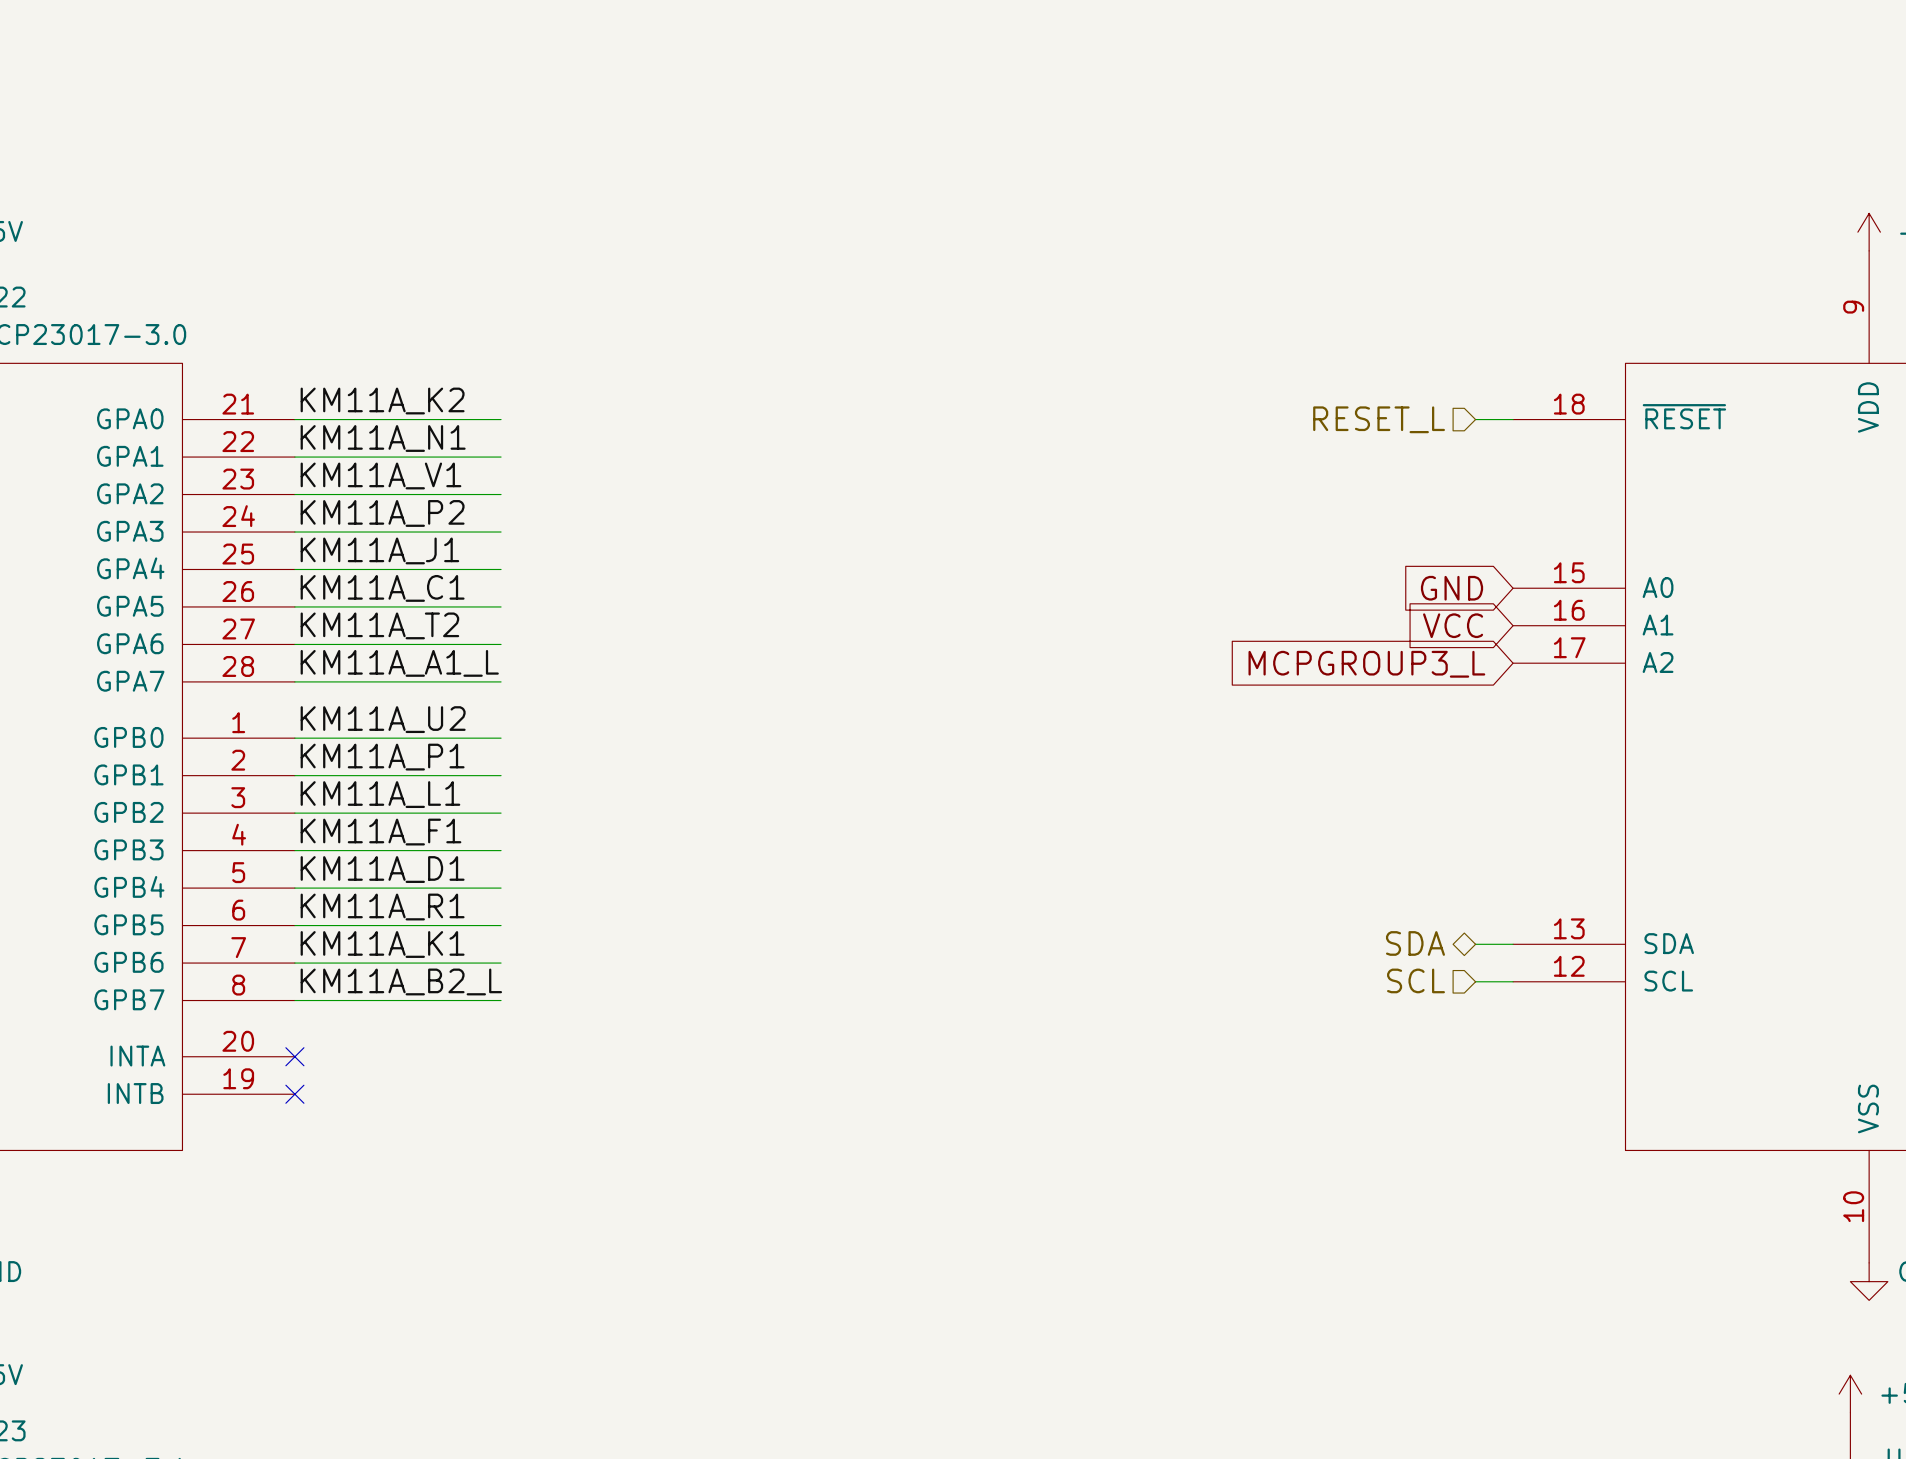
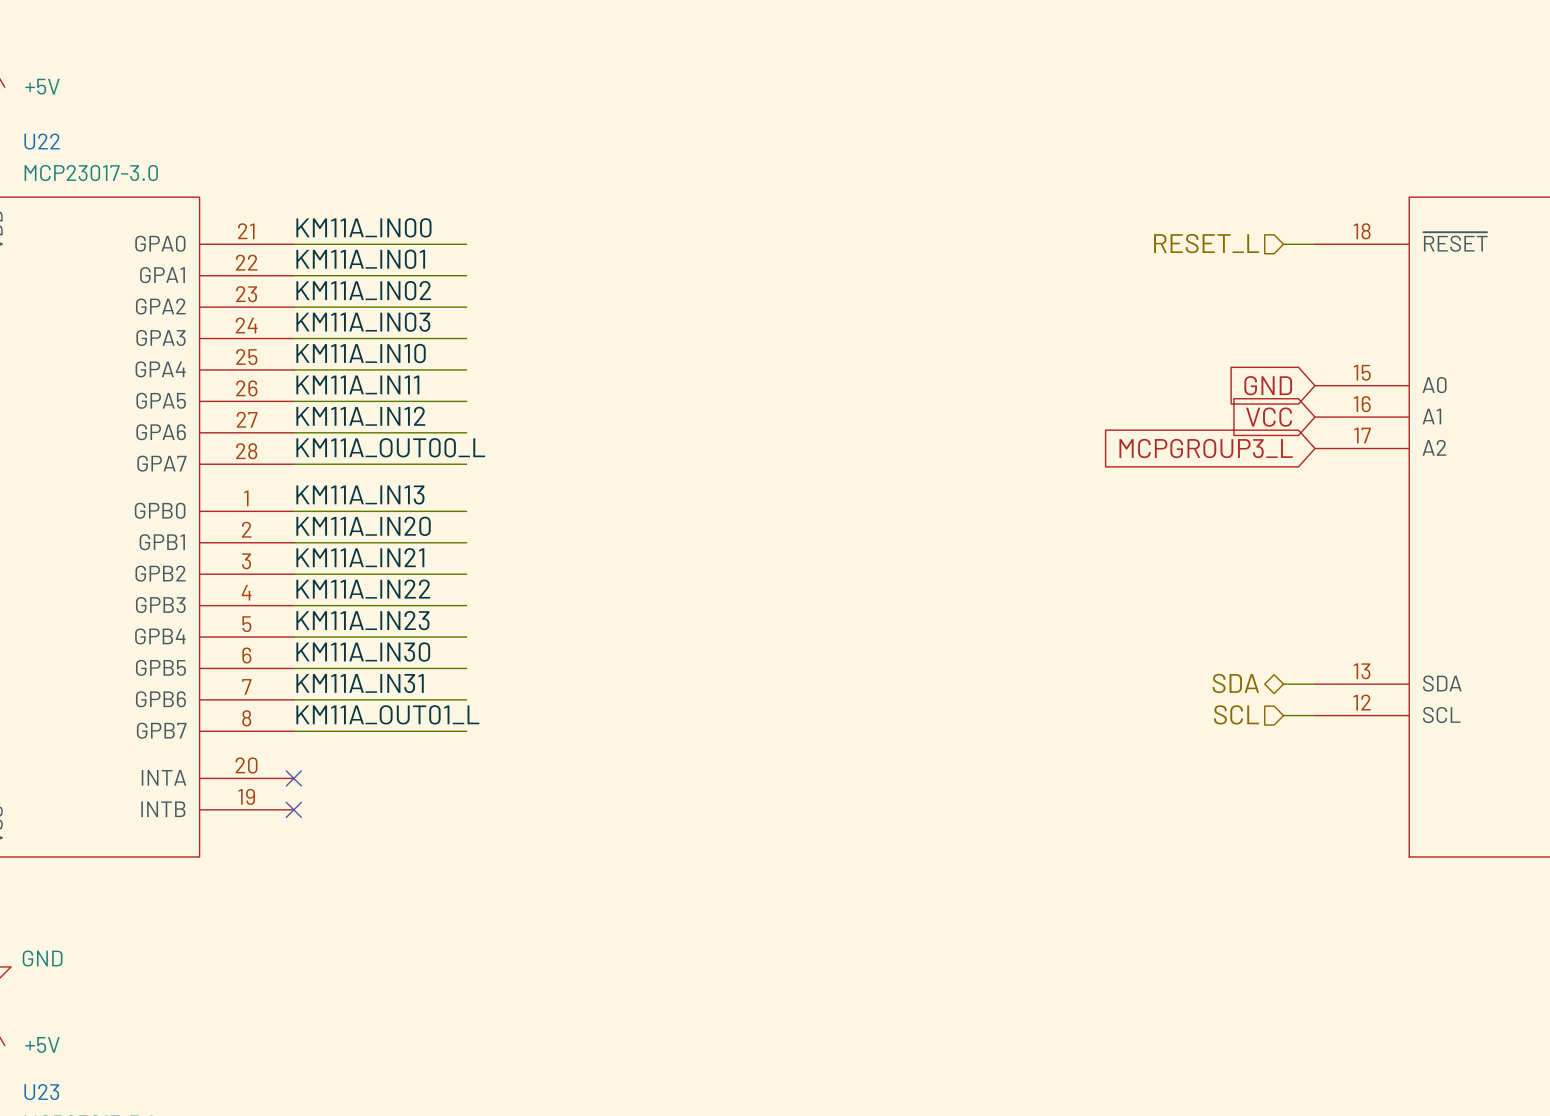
label: KM11A_K2 (382, 401) -> KM11A_IN00 (363, 227)
label: KM11A_N1 (383, 438) -> KM11A_IN01 (360, 259)
label: KM11A_V1 (380, 475) -> KM11A_IN02 (363, 290)
label: KM11A_P2 (382, 513) -> KM11A_IN03 (363, 322)
label: KM11A_J1 (379, 550) -> KM11A_IN10 (361, 353)
label: KM11A_C1 (382, 588) -> KM11A_IN11 (357, 384)
label: KM11A_T2 (379, 625) -> KM11A_IN12 (360, 416)
label: KM11A_A1_L (399, 663) -> KM11A_OUT00_L (390, 447)
label: KM11A_U2 (383, 719) -> KM11A_IN13 (360, 495)
label: KM11A_P1 (382, 757) -> KM11A_IN20 (363, 526)
label: KM11A_L1 (380, 794) -> KM11A_IN21 (360, 557)
label: KM11A_F1 (380, 832) -> KM11A_IN22 (363, 589)
label: KM11A_D1 (382, 869) -> KM11A_IN23 (362, 620)
label: KM11A_R1 (382, 907) -> KM11A_IN30 (363, 652)
label: KM11A_K1 (382, 944) -> KM11A_IN31 (360, 683)
label: KM11A_B2_L (401, 981) -> KM11A_OUT01_L (387, 714)

